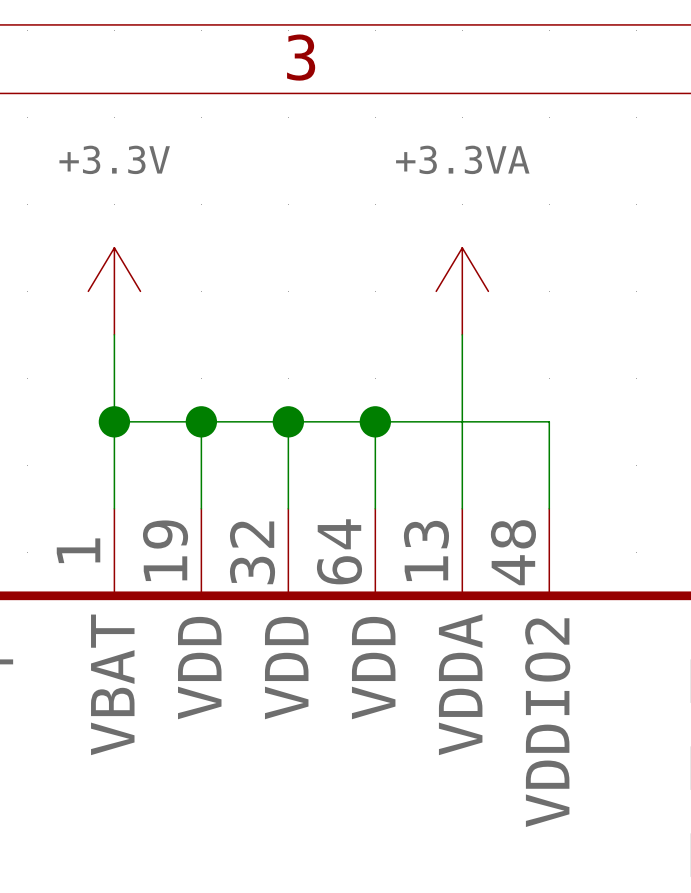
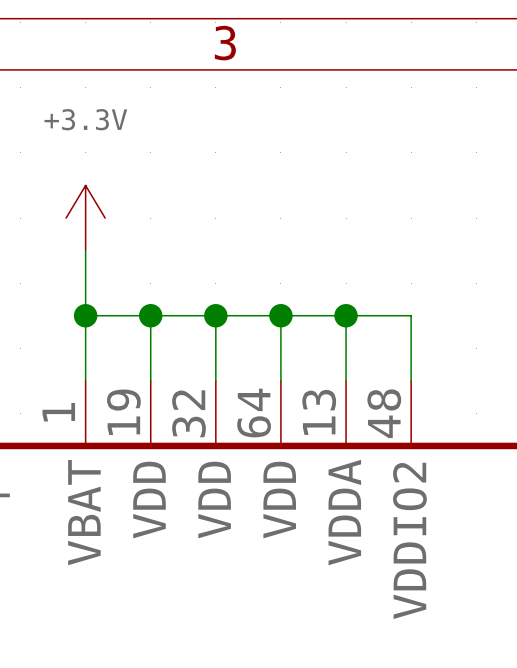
power symbol: +3.3VA (462, 291) -> none
wire: (462, 334) (462, 421) -> none
junction: none -> (346, 315)

